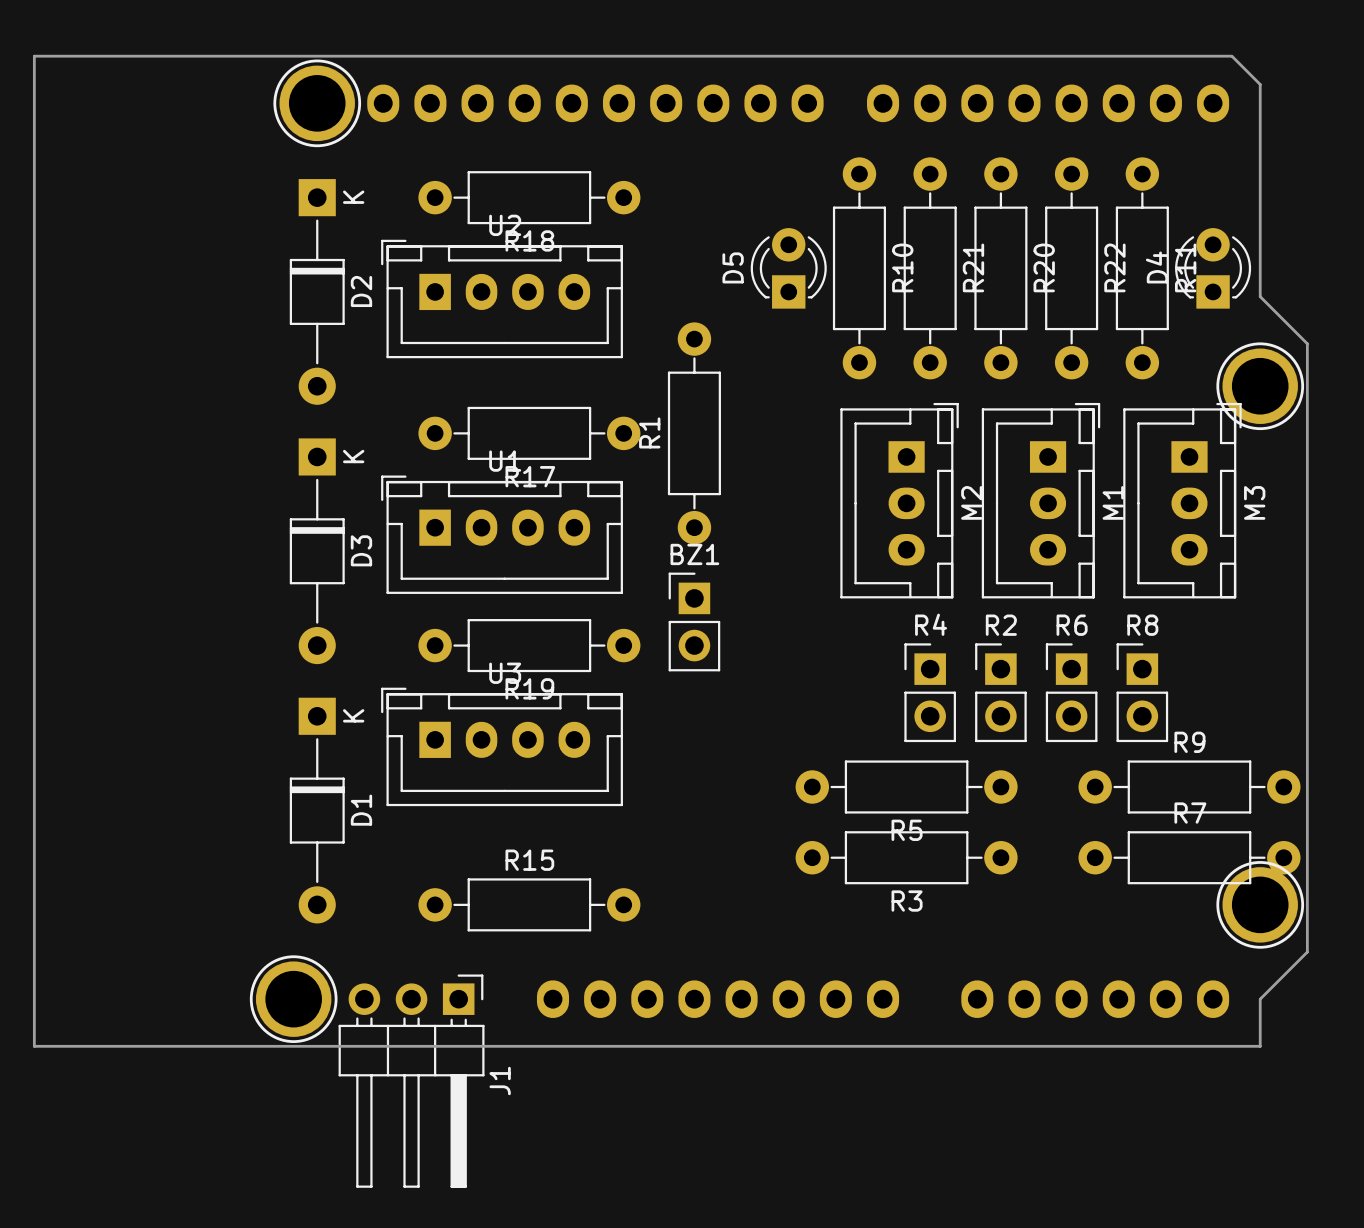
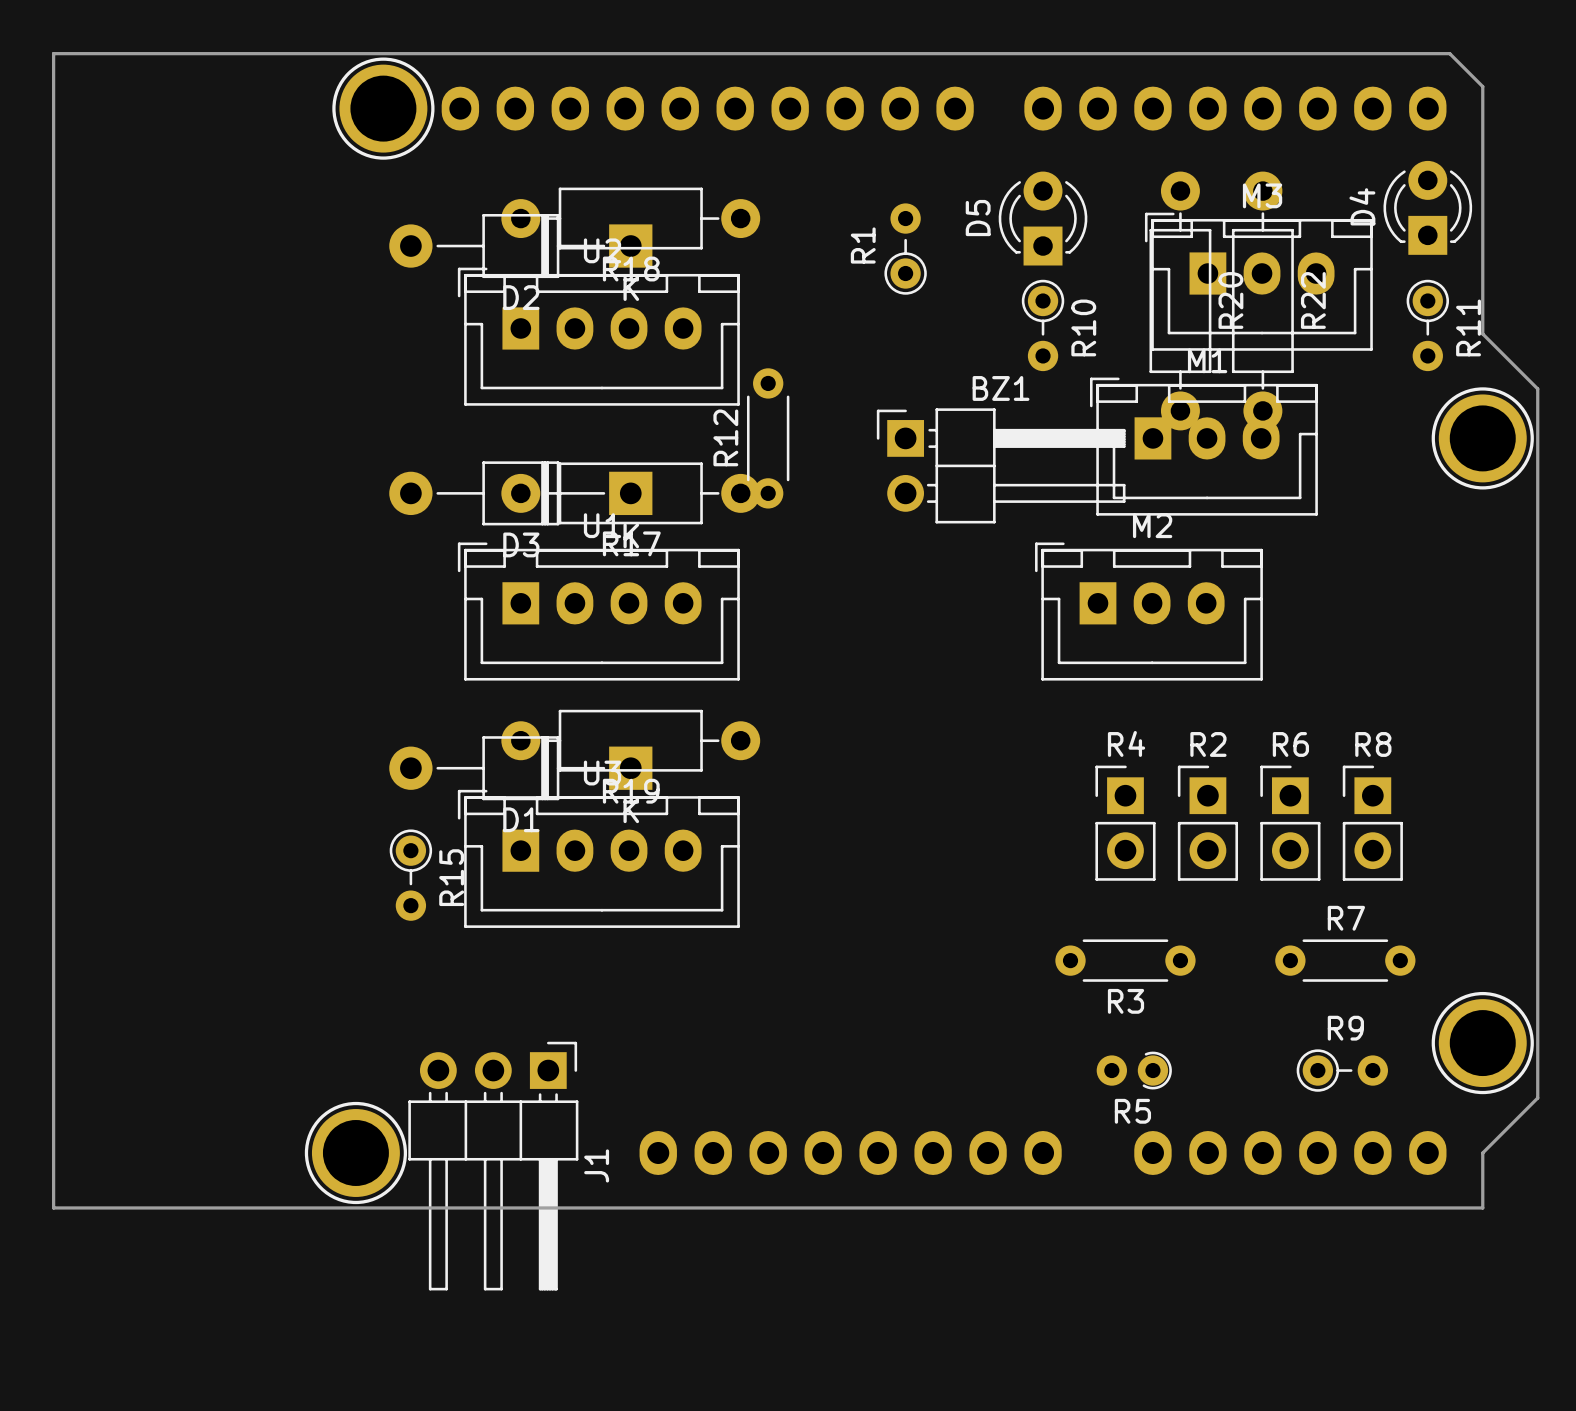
R10 footprint: [832, 157, 887, 380] -> [1021, 279, 1065, 372]
R11 footprint: [1115, 157, 1169, 380] -> [1406, 279, 1450, 372]
D5 position: (788, 268) -> (1043, 218)
R21: (930, 268) -> none
D4 position: (1213, 268) -> (1427, 207)
D2 rotation: 0° (317, 291) -> 90° clockwise (520, 246)
D2 position: (317, 291) -> (520, 246)
R1 footprint: [667, 322, 721, 545] -> [884, 203, 927, 295]
R12: none -> (768, 438)
M2 rotation: 0° (899, 500) -> 90° counterclockwise (1148, 611)
M1 rotation: 0° (1041, 500) -> 90° counterclockwise (1203, 446)
M3 rotation: 0° (1182, 500) -> 90° counterclockwise (1258, 281)
M3 position: (1182, 500) -> (1258, 281)
D3 rotation: 0° (317, 551) -> 90° clockwise (520, 493)
D3 position: (317, 551) -> (520, 493)
BZ1 footprint: [668, 572, 721, 672] -> [876, 408, 1126, 524]
R4 position: (930, 692) -> (1125, 823)
R2 position: (1000, 692) -> (1207, 823)
R6 position: (1071, 692) -> (1290, 823)
R8 position: (1142, 692) -> (1372, 823)
R5 footprint: [795, 760, 1018, 814] -> [1096, 1051, 1172, 1090]
R9 footprint: [1078, 760, 1301, 814] -> [1296, 1049, 1388, 1092]
D1 rotation: 0° (317, 810) -> 90° clockwise (520, 768)
D1 position: (317, 810) -> (520, 768)
R3 footprint: [795, 831, 1018, 885] -> [1055, 939, 1196, 982]
R7 footprint: [1078, 831, 1301, 885] -> [1275, 939, 1416, 982]
R15 name position: R15 (529, 860) -> R15 (451, 877)
R15 footprint: [418, 878, 641, 932] -> [389, 829, 433, 921]
J1 position: (411, 1081) -> (493, 1166)

